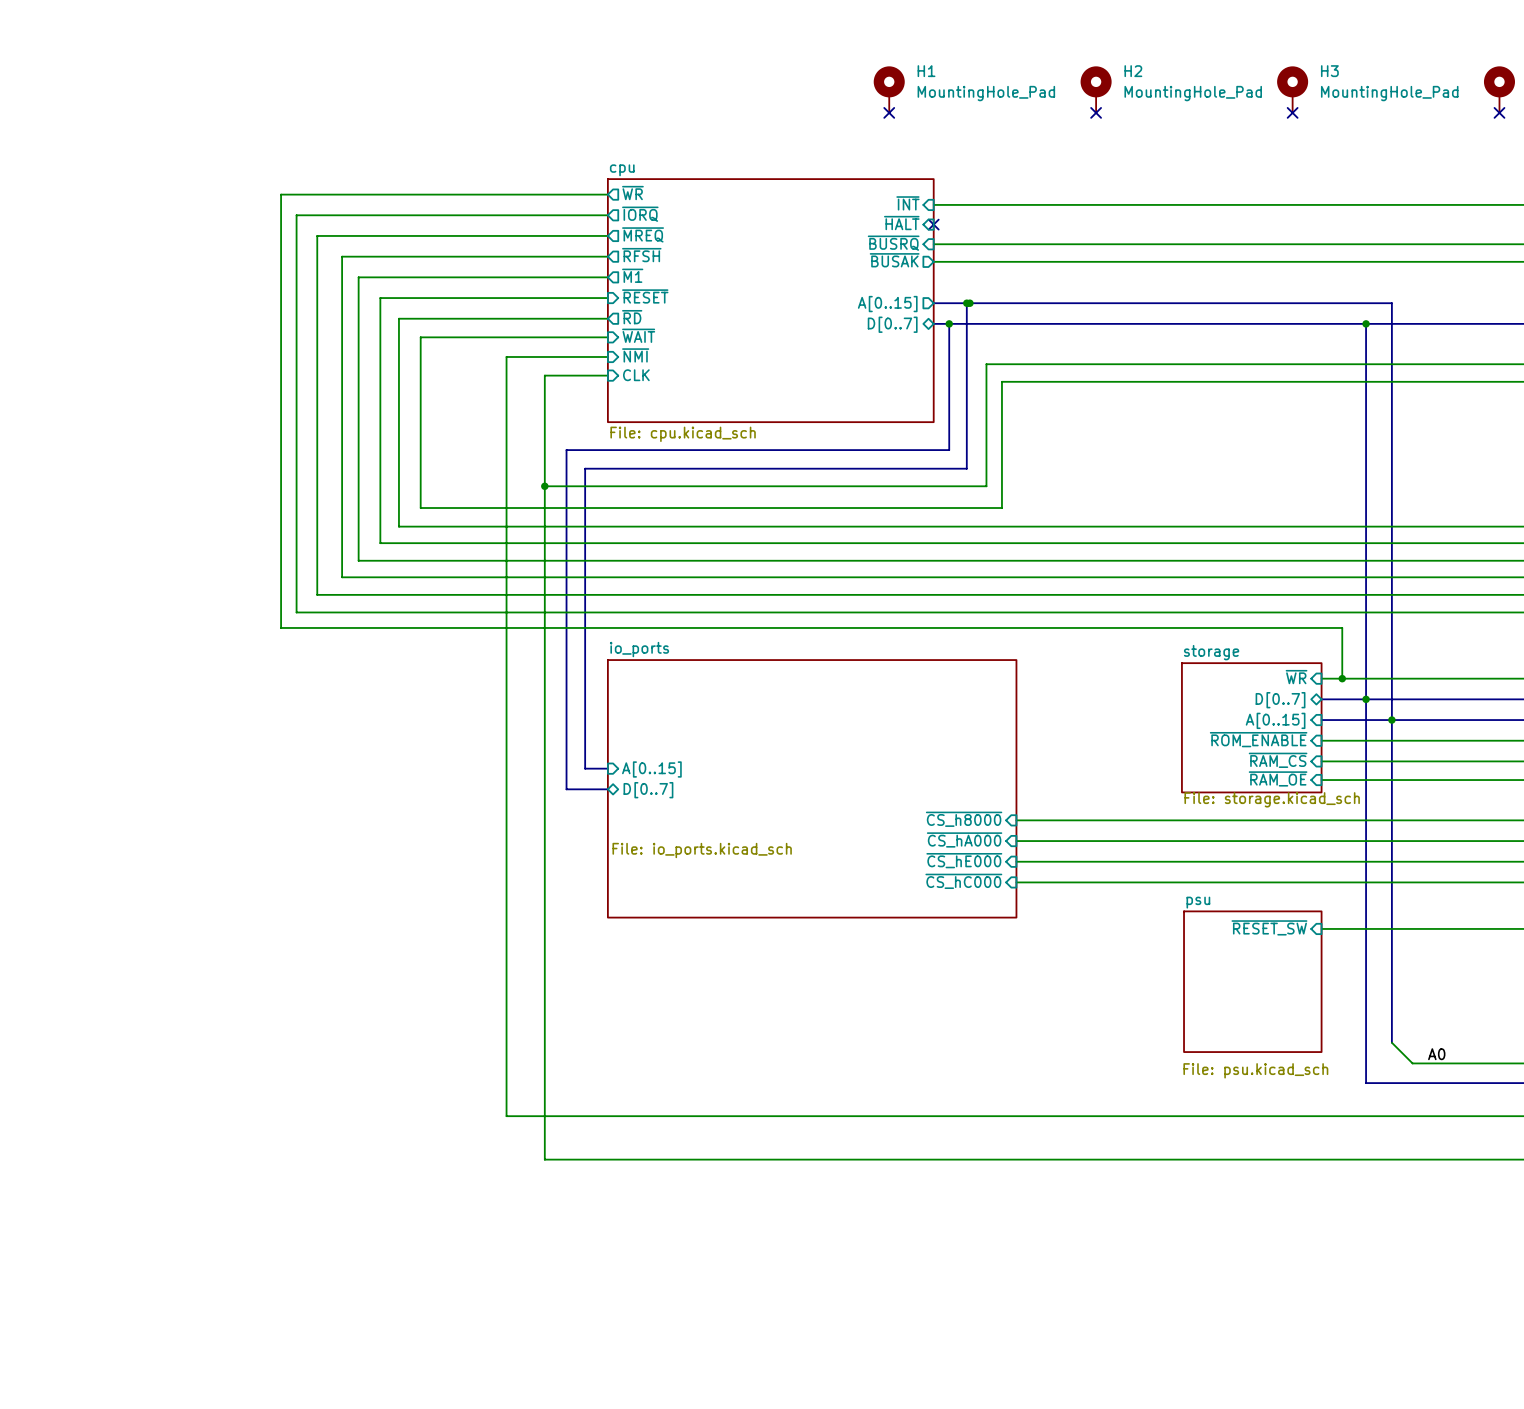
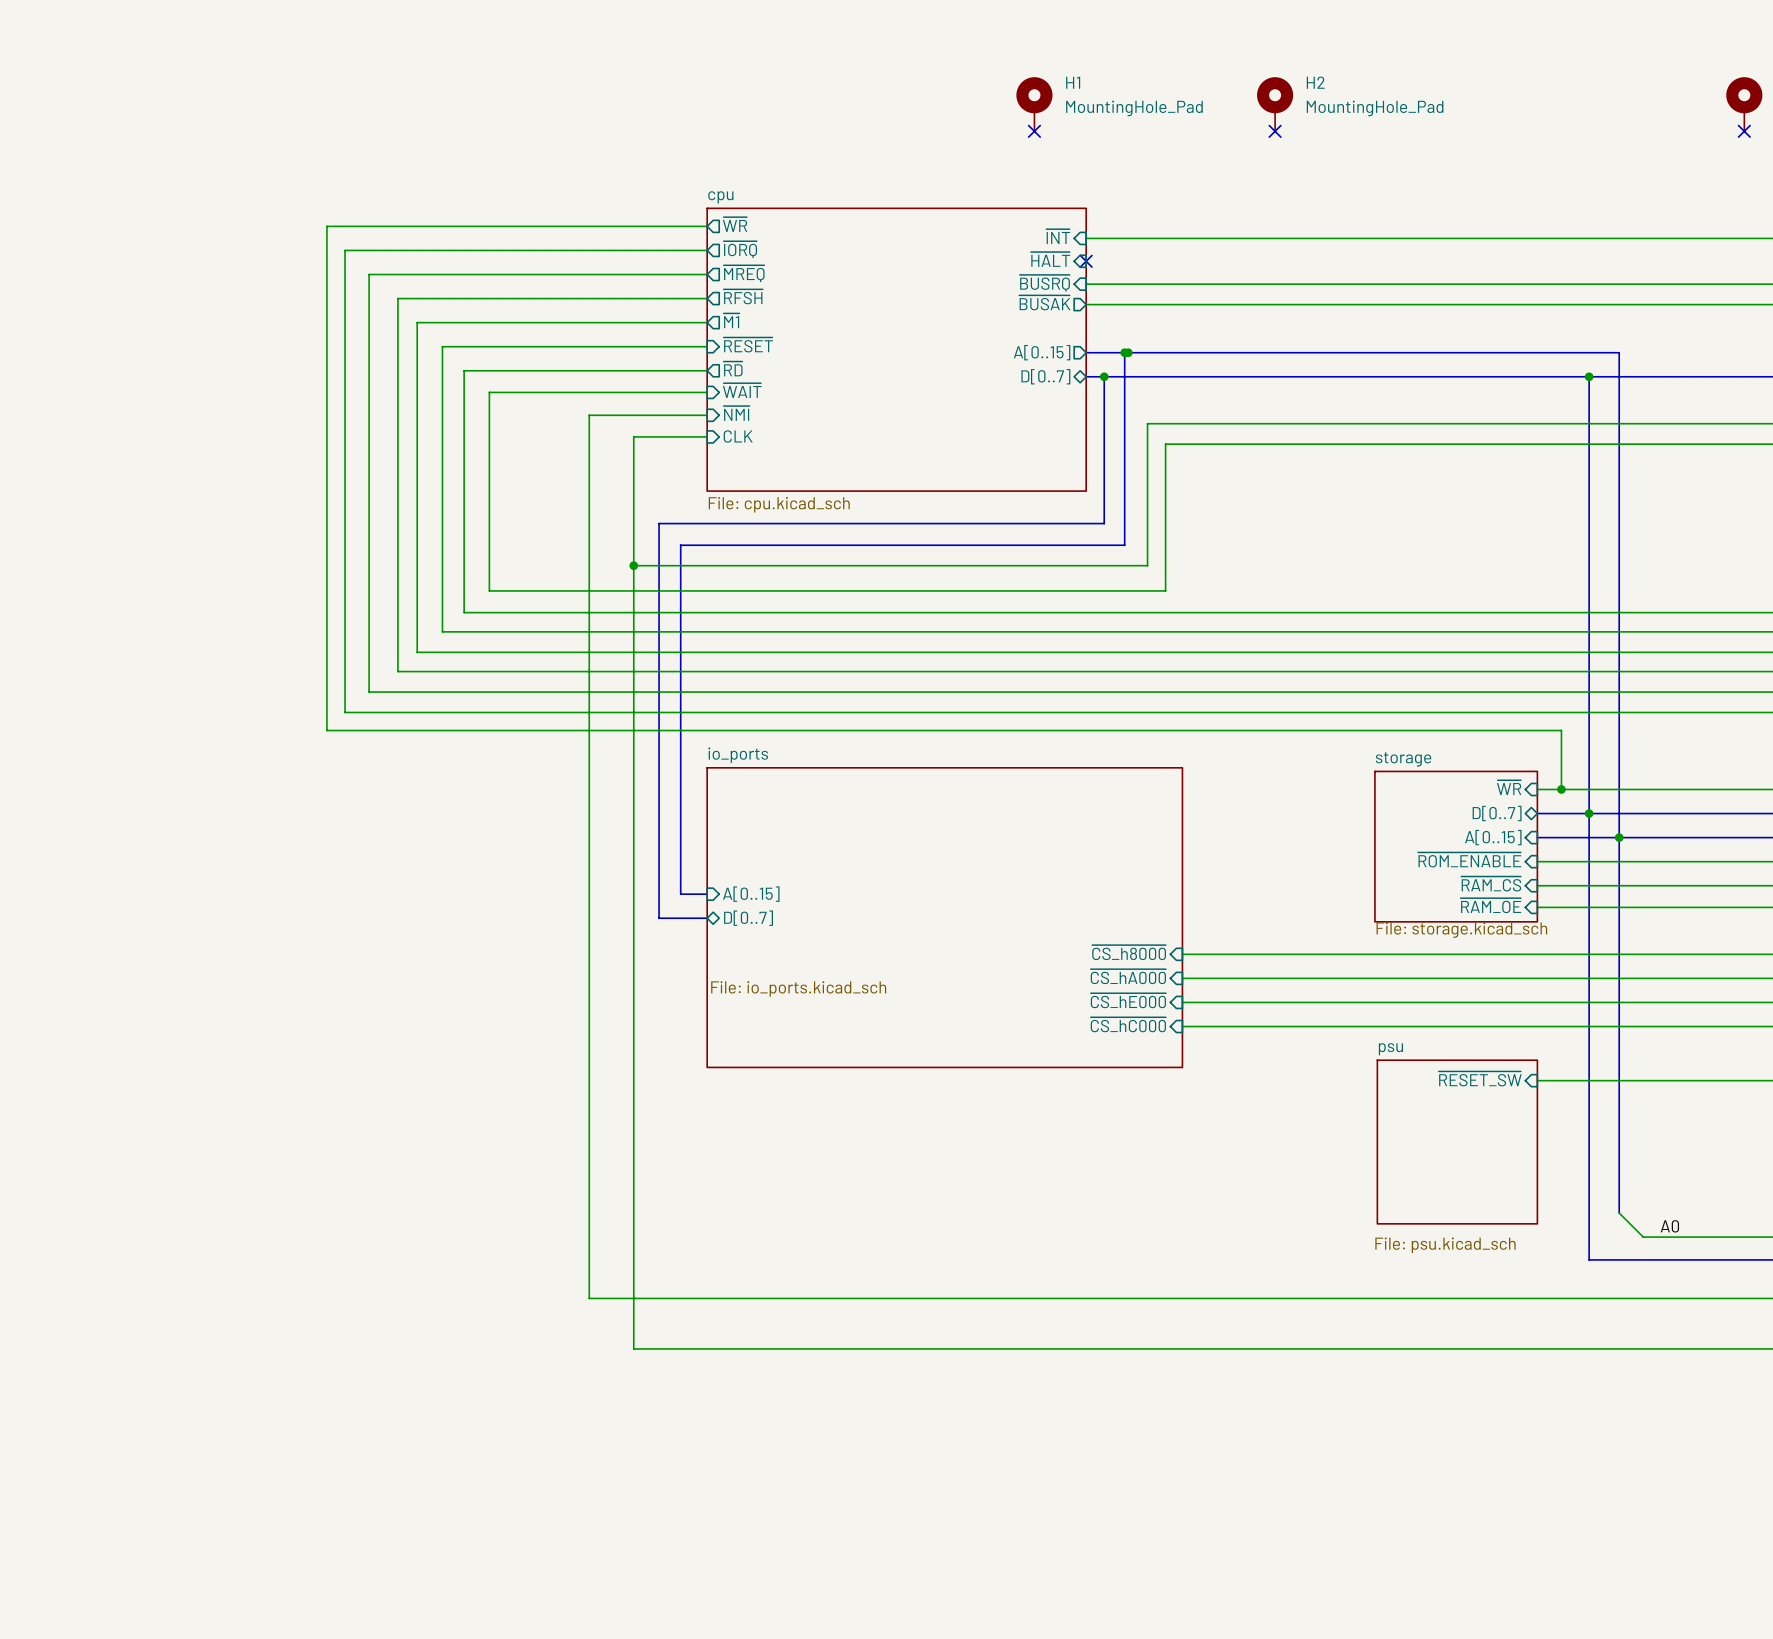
H3: MountingHole_Pad (1292, 89) -> none
no-connect mark: (1292, 112) -> none

